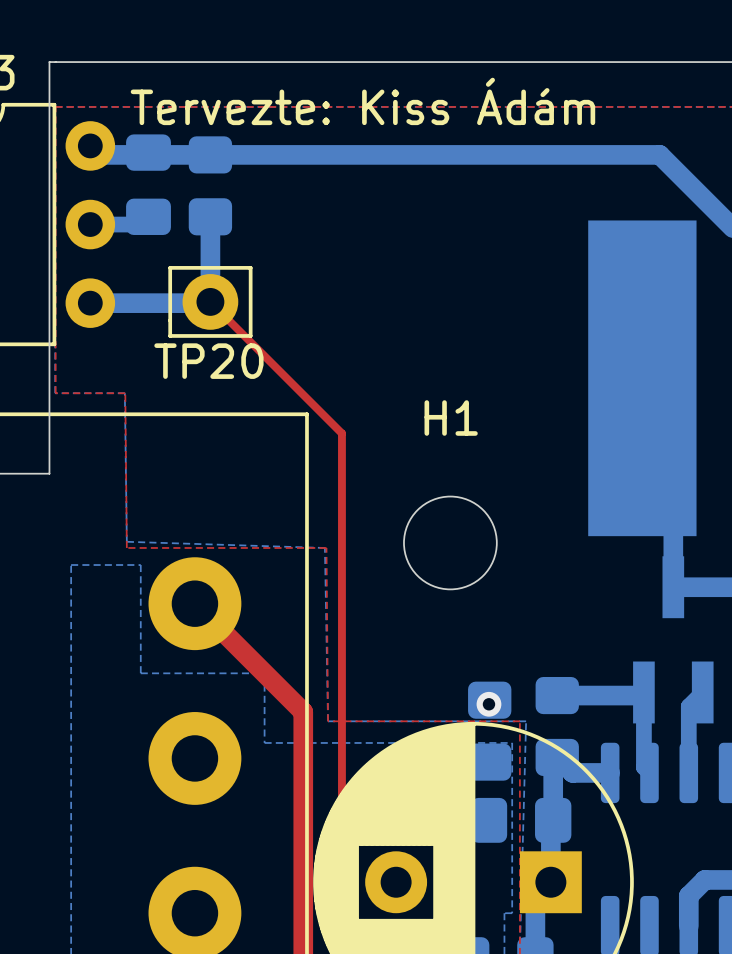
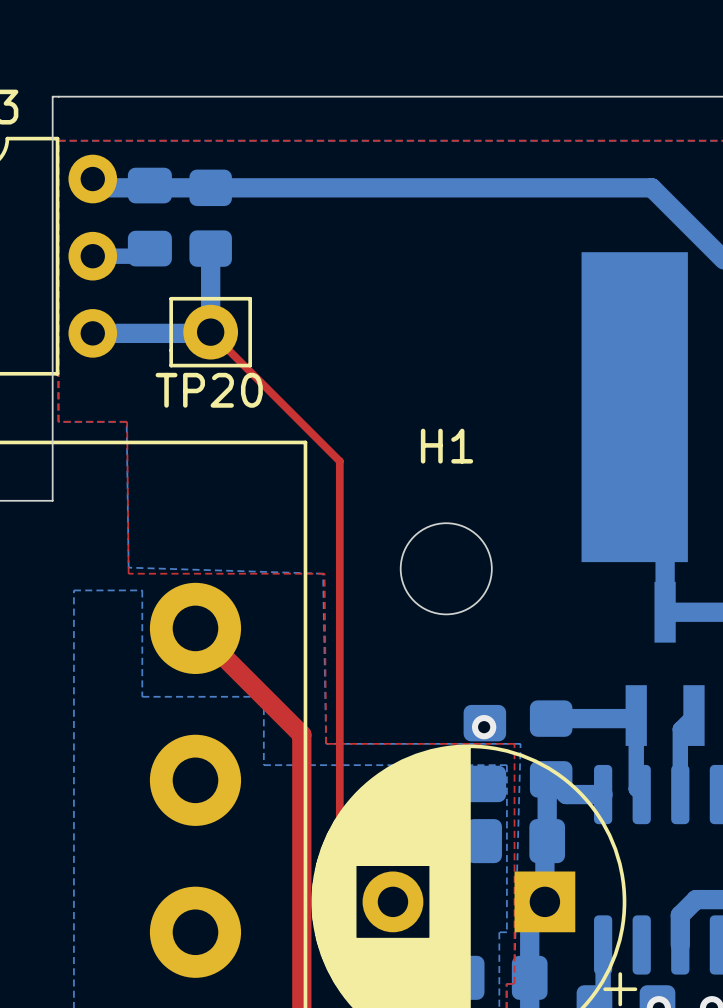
text: Tervezte: Kiss Ádám (362, 101) -> none

